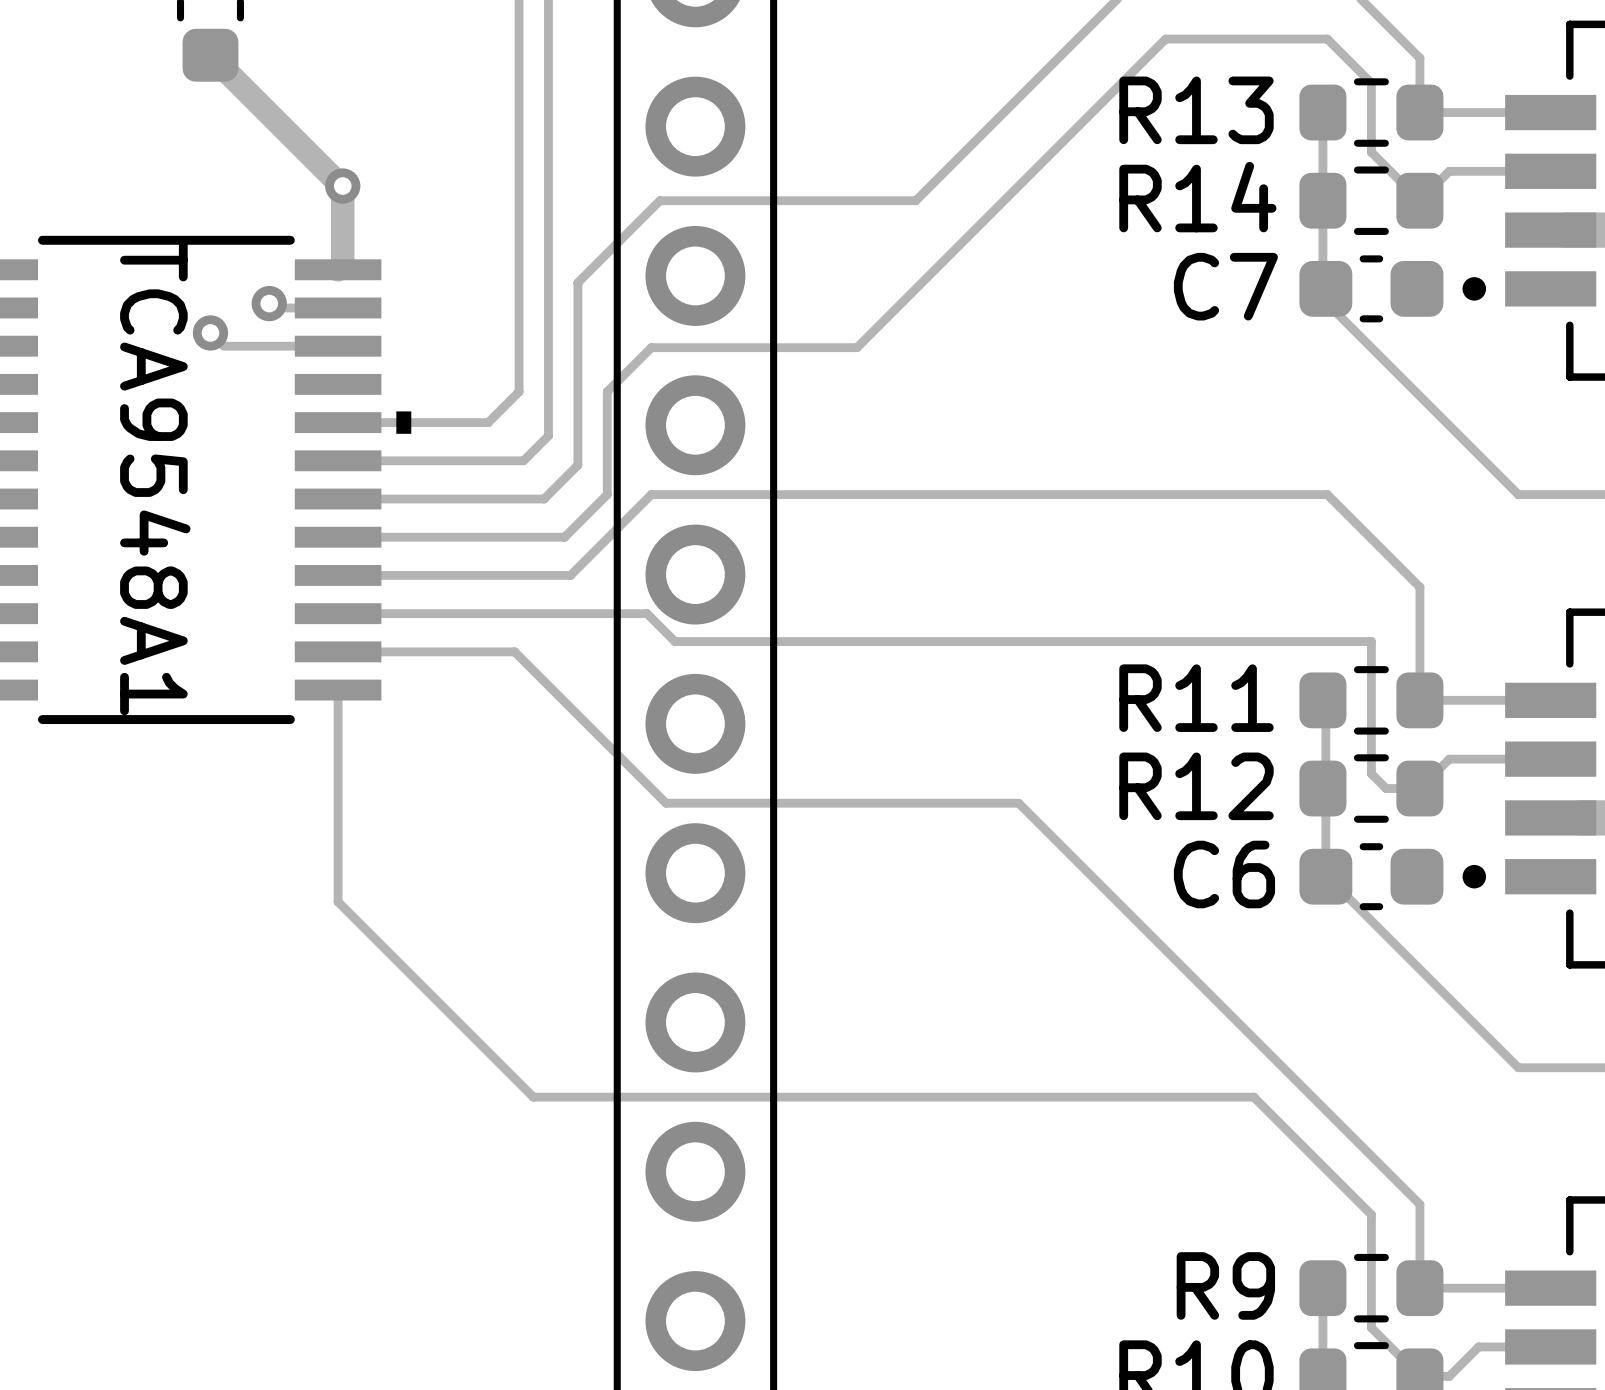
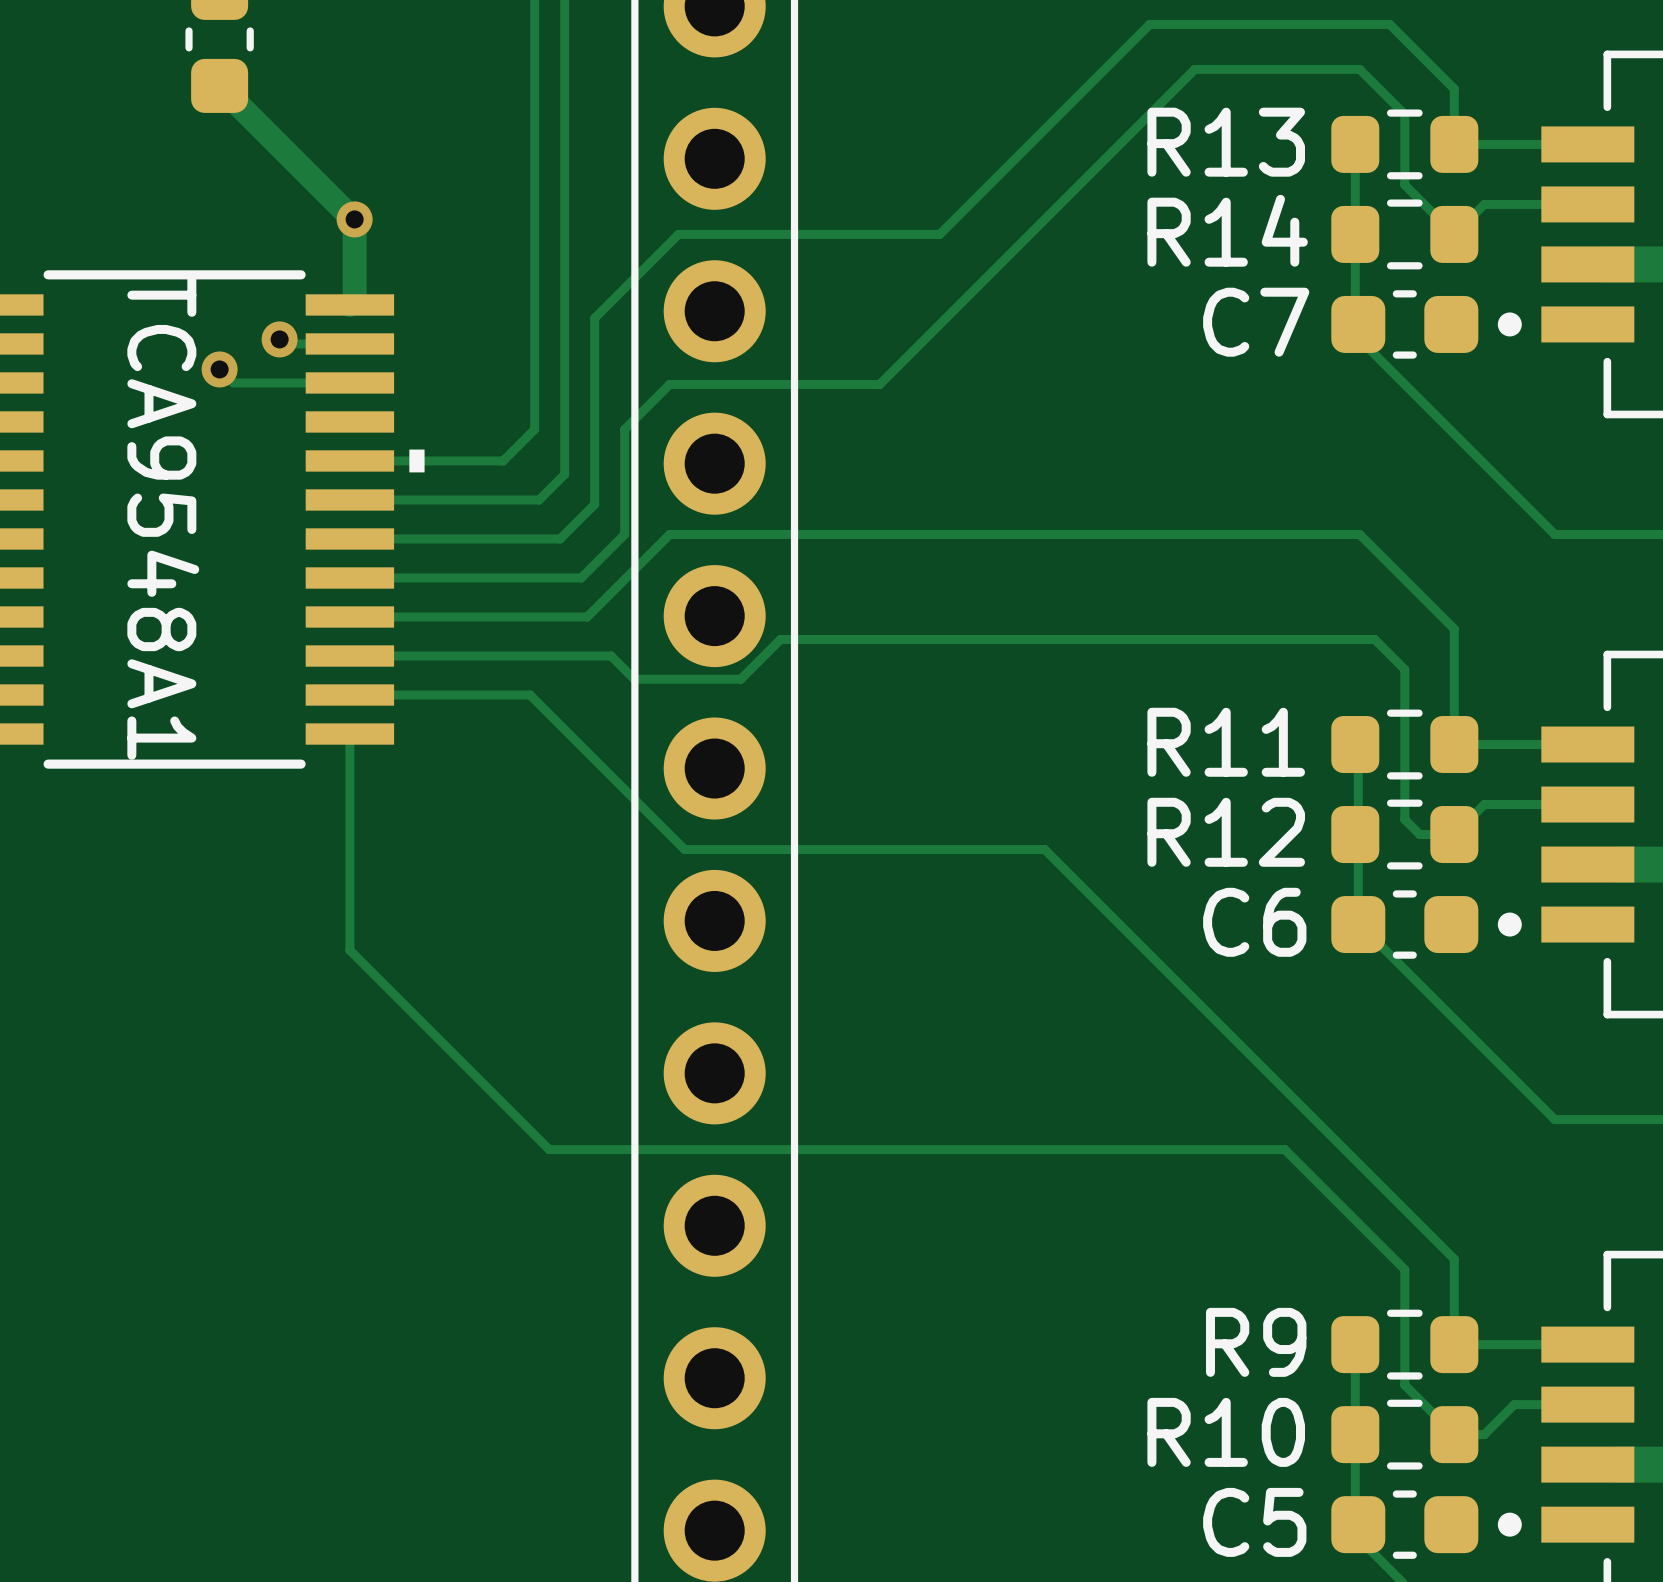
track: (594, 613) (647, 613) (674, 641) (1371, 641) -> (611, 656) (634, 679) (740, 679) (780, 639) (1374, 639) (1404, 669) (1404, 684)

